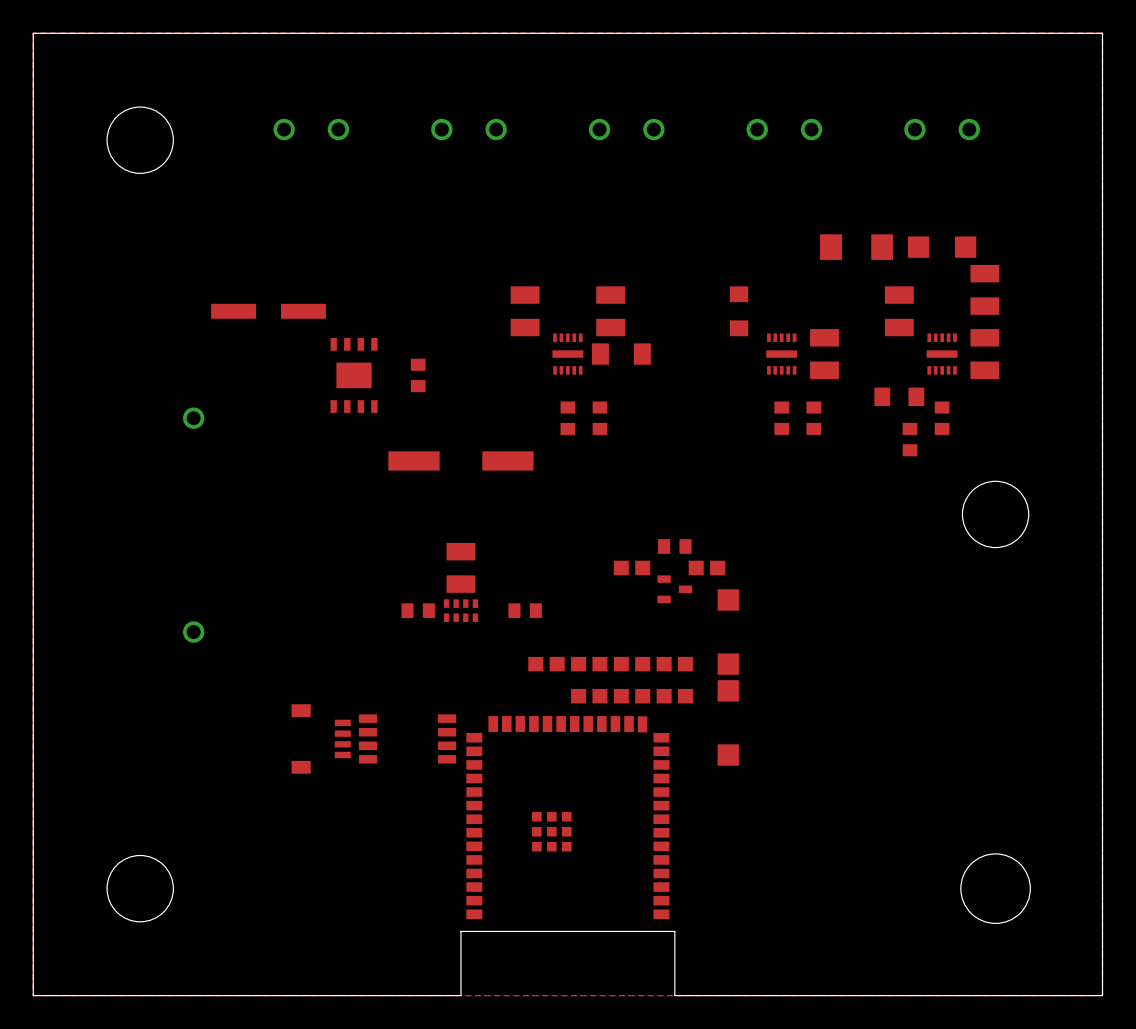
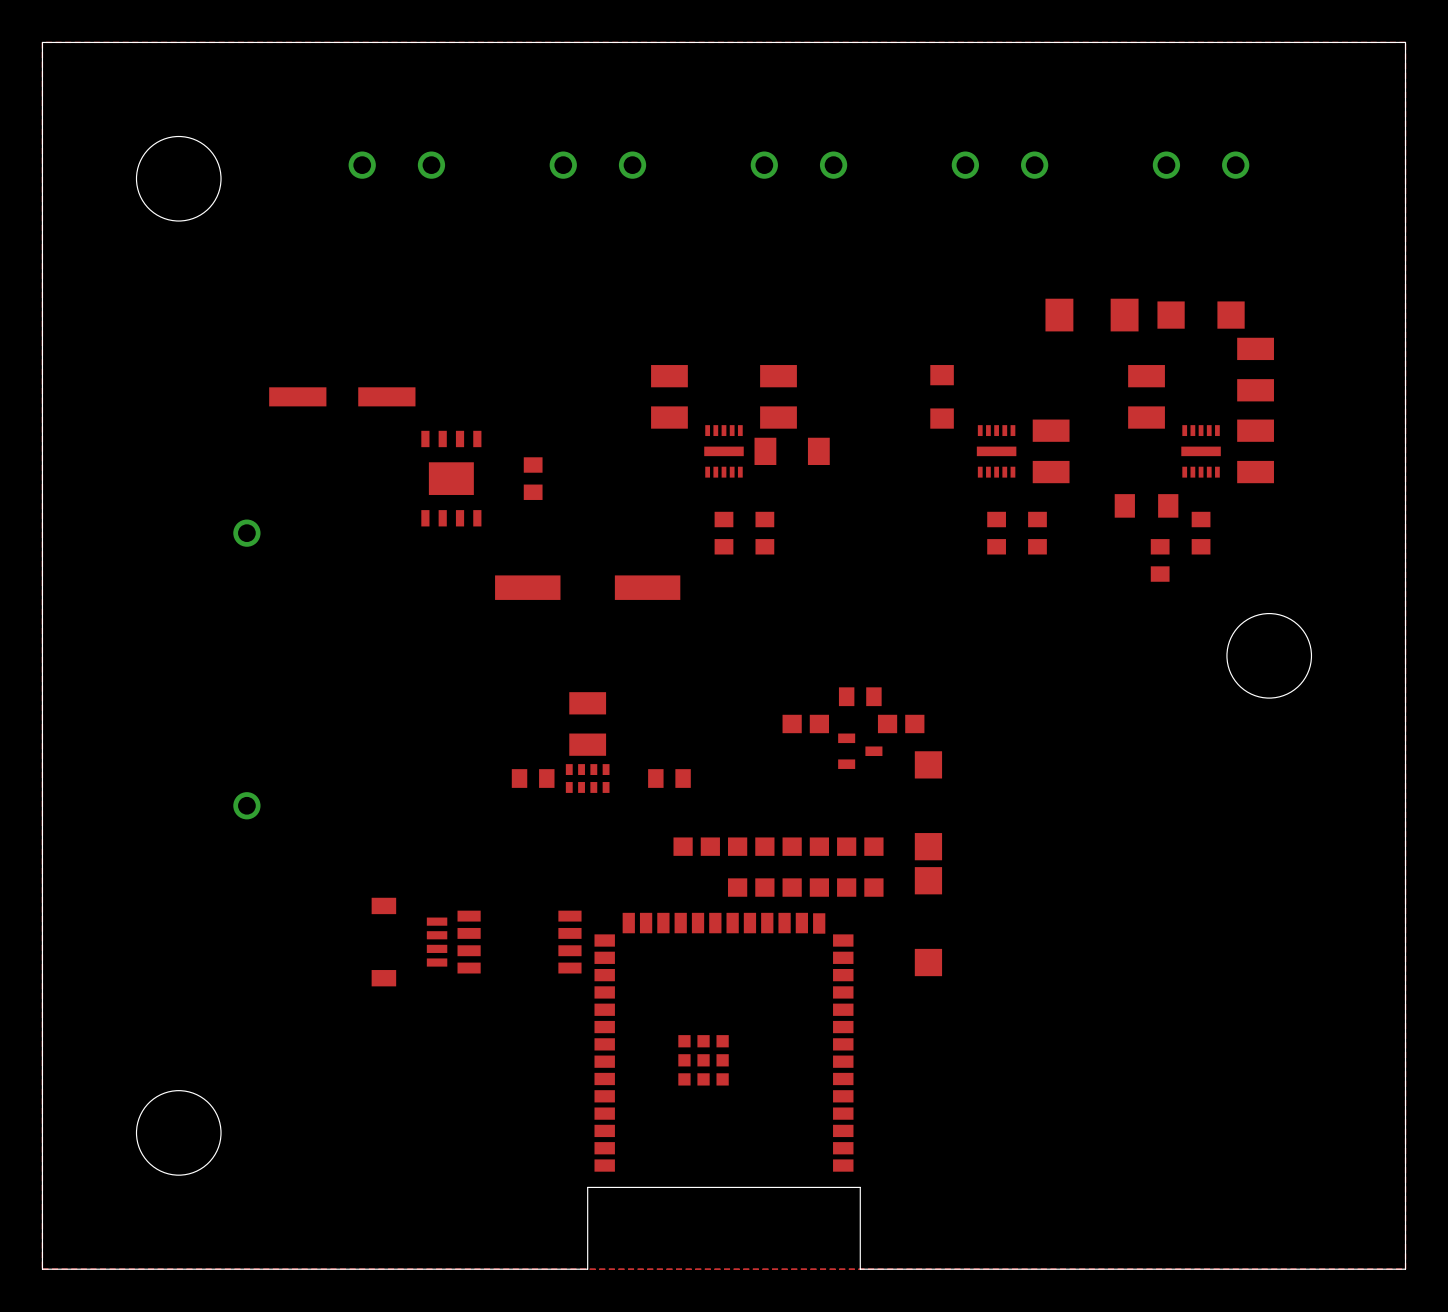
round board edge: [960, 853, 1031, 924] -> none

